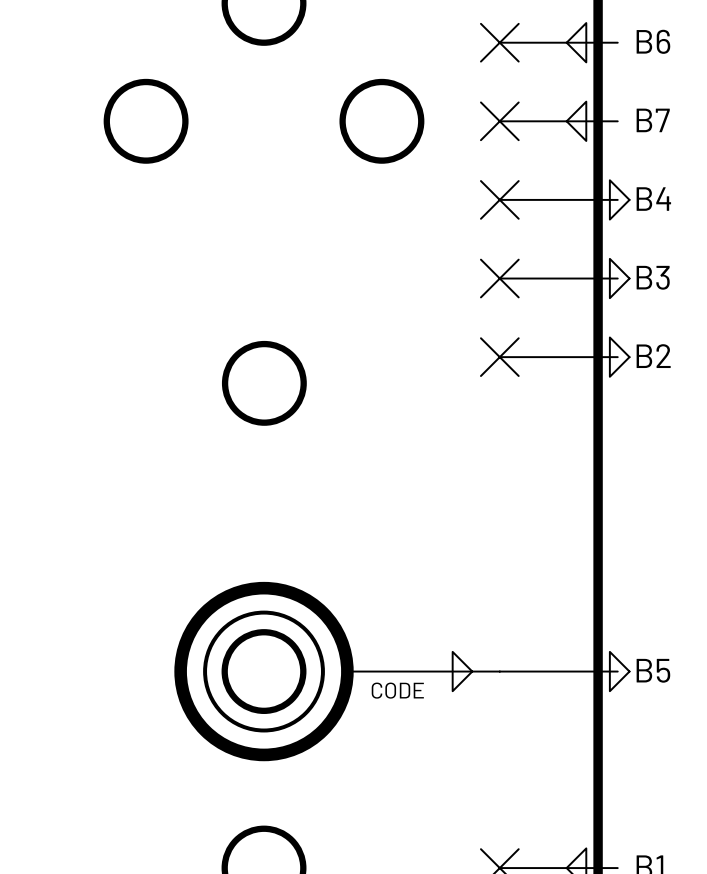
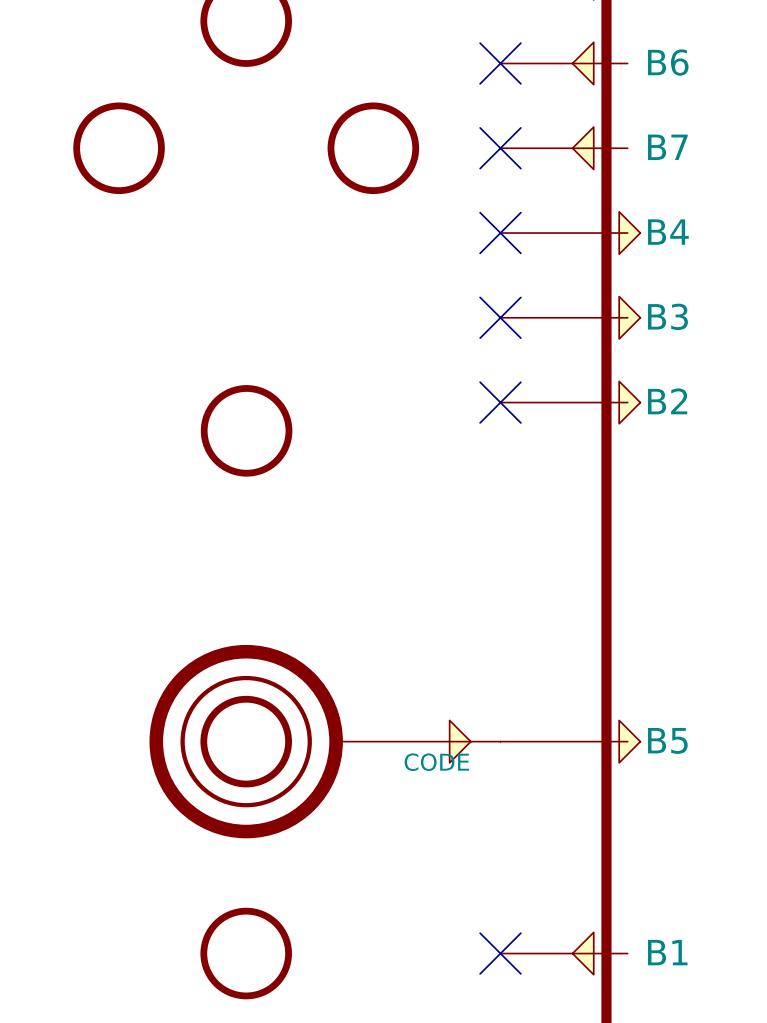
part value position: CODE (397, 690) -> CODE (436, 762)

